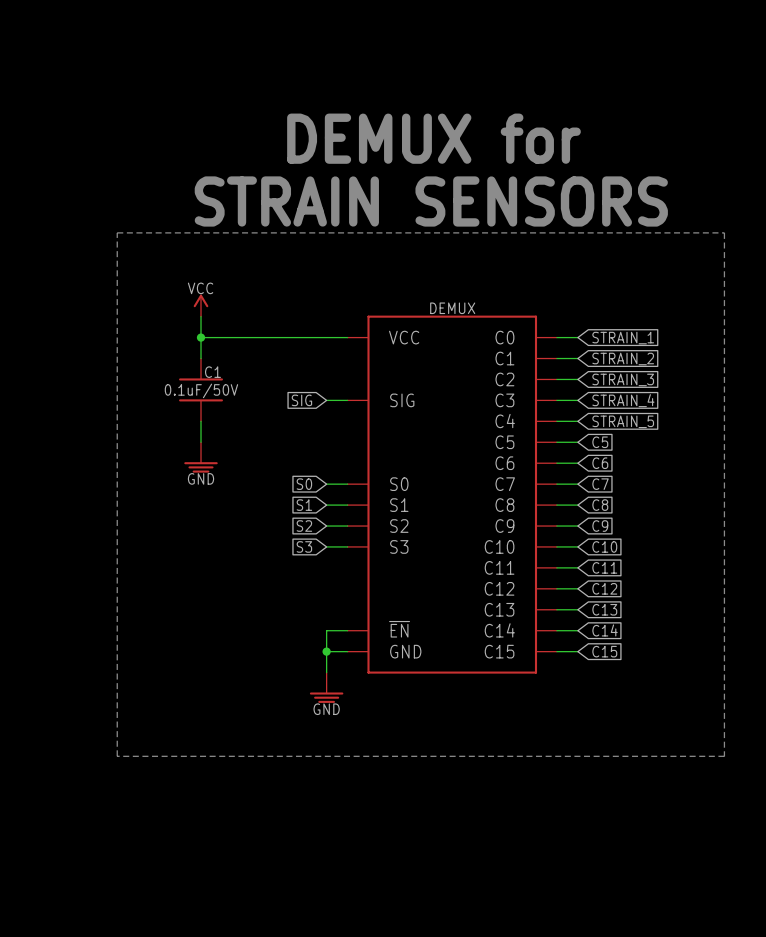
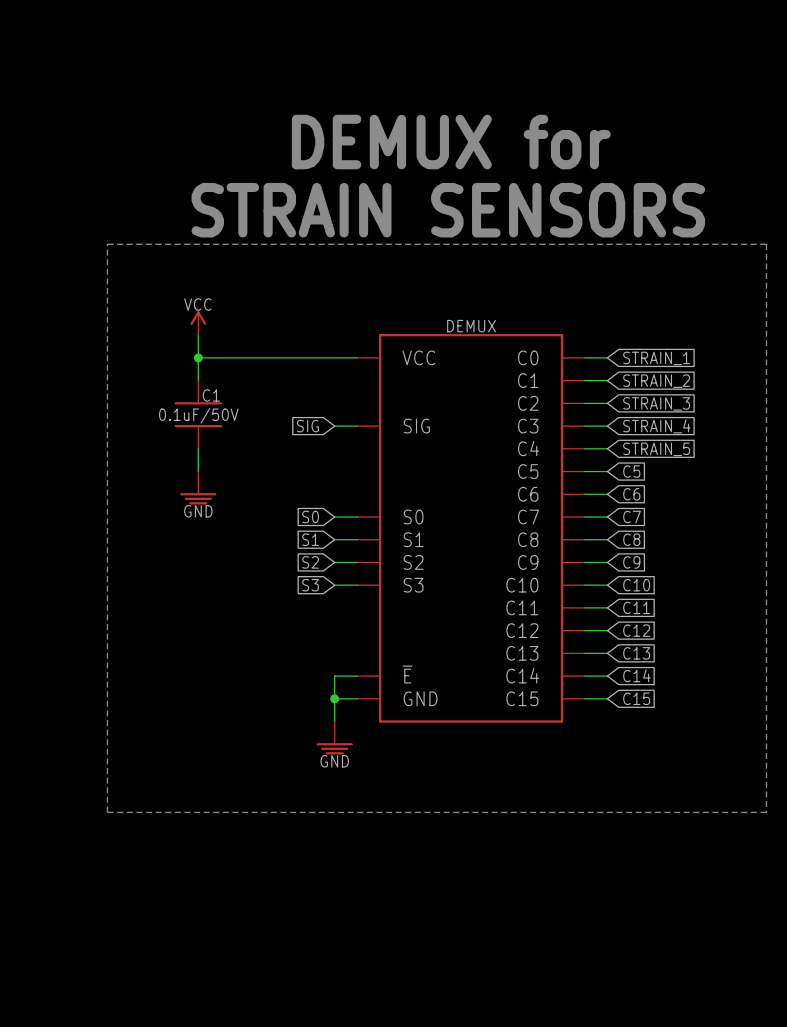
DEMUX pin name: ~{EN} (399, 629) -> ~{E} (407, 674)

